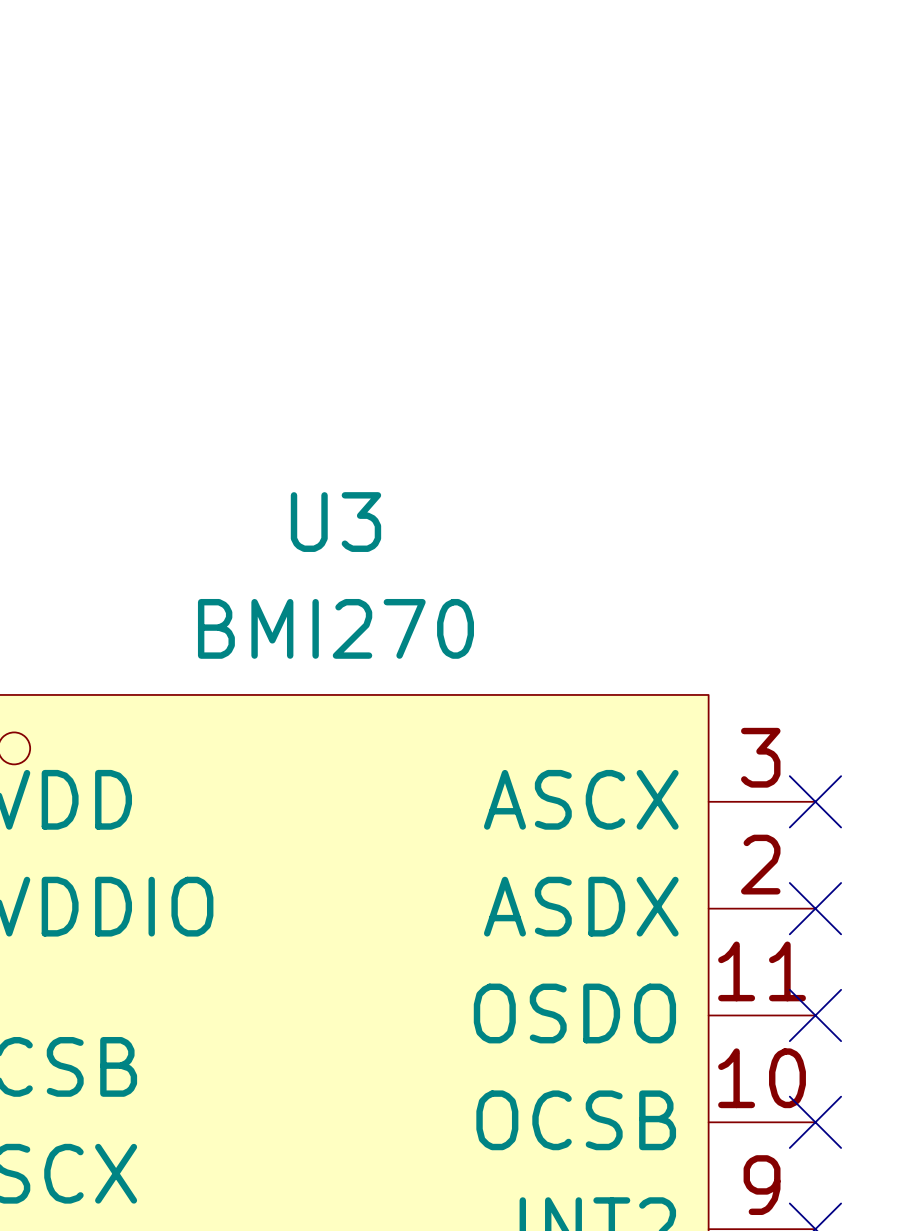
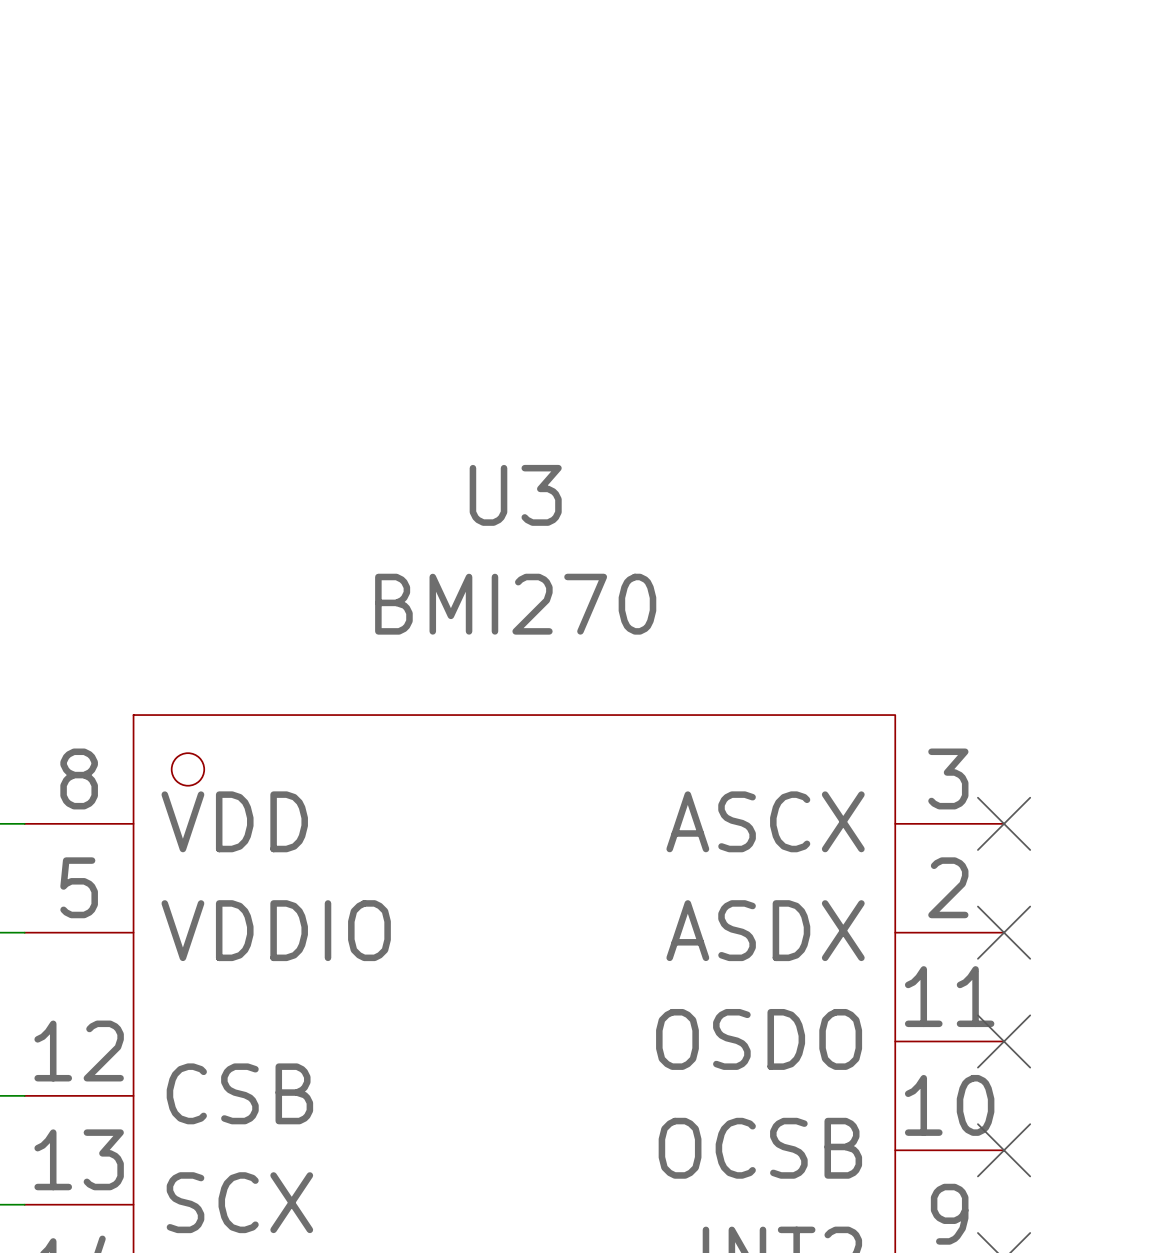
U3 name position: U3 (335, 522) -> U3 (515, 495)
U3 value position: BMI270 (335, 628) -> BMI270 (515, 604)

